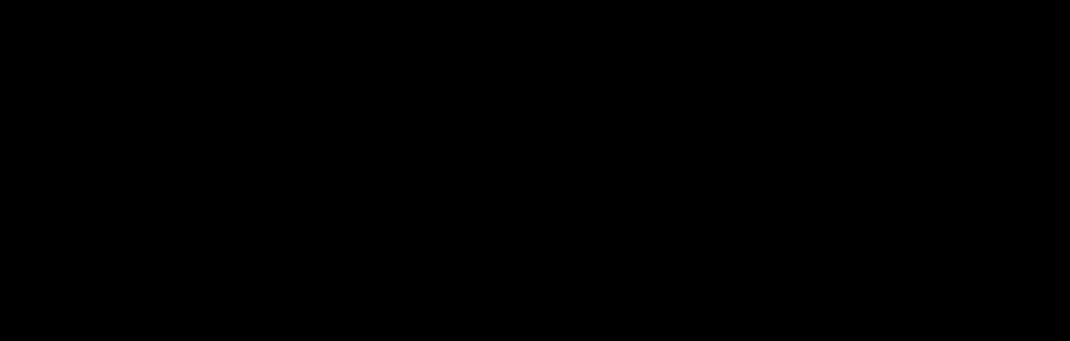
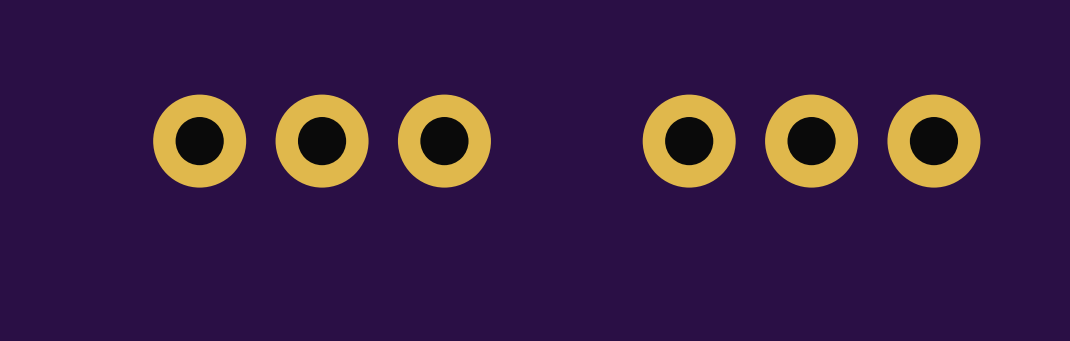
part: none -> (322, 141)
part: none -> (811, 141)

